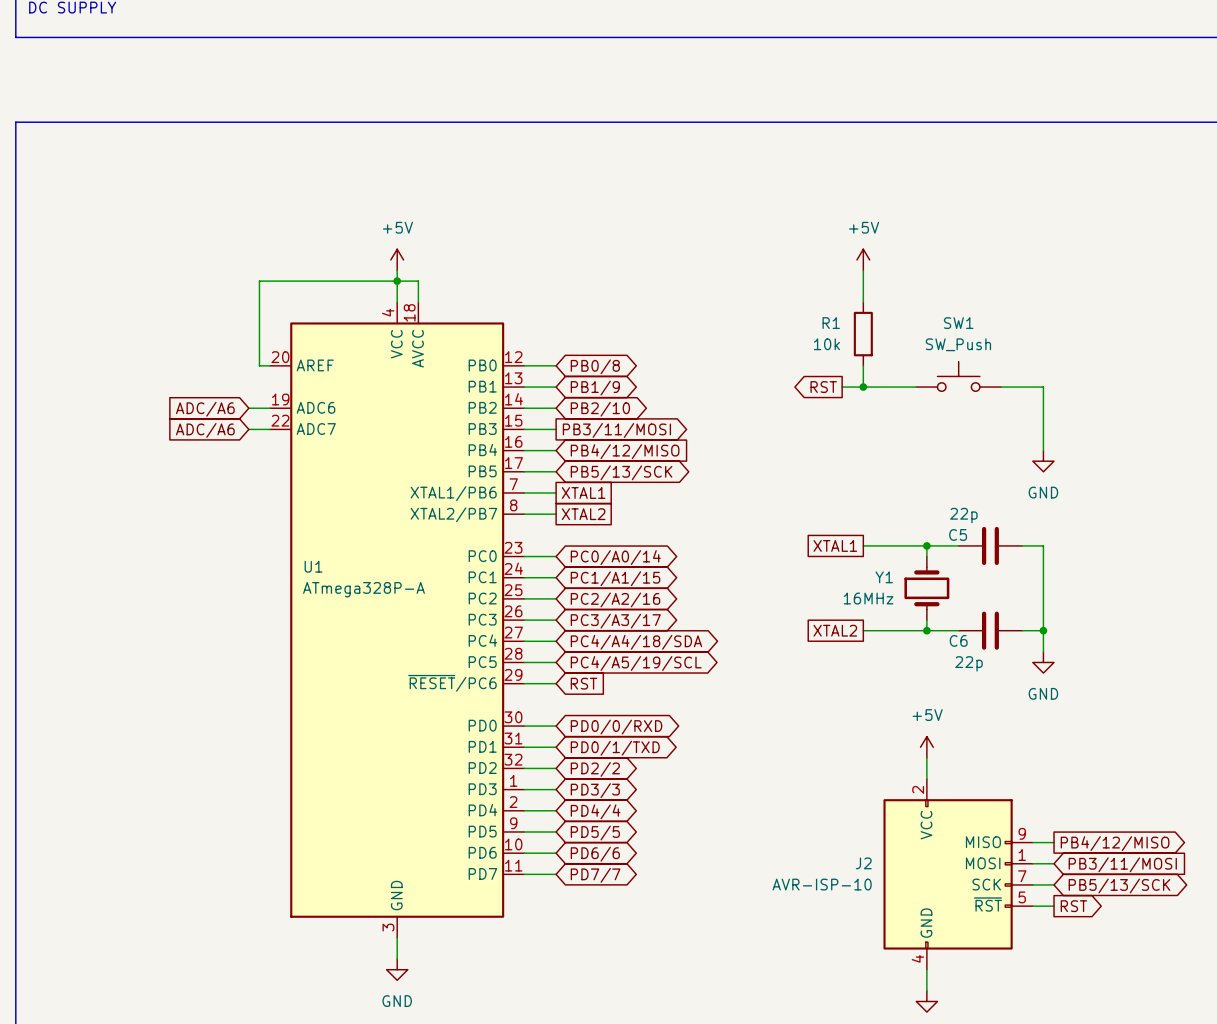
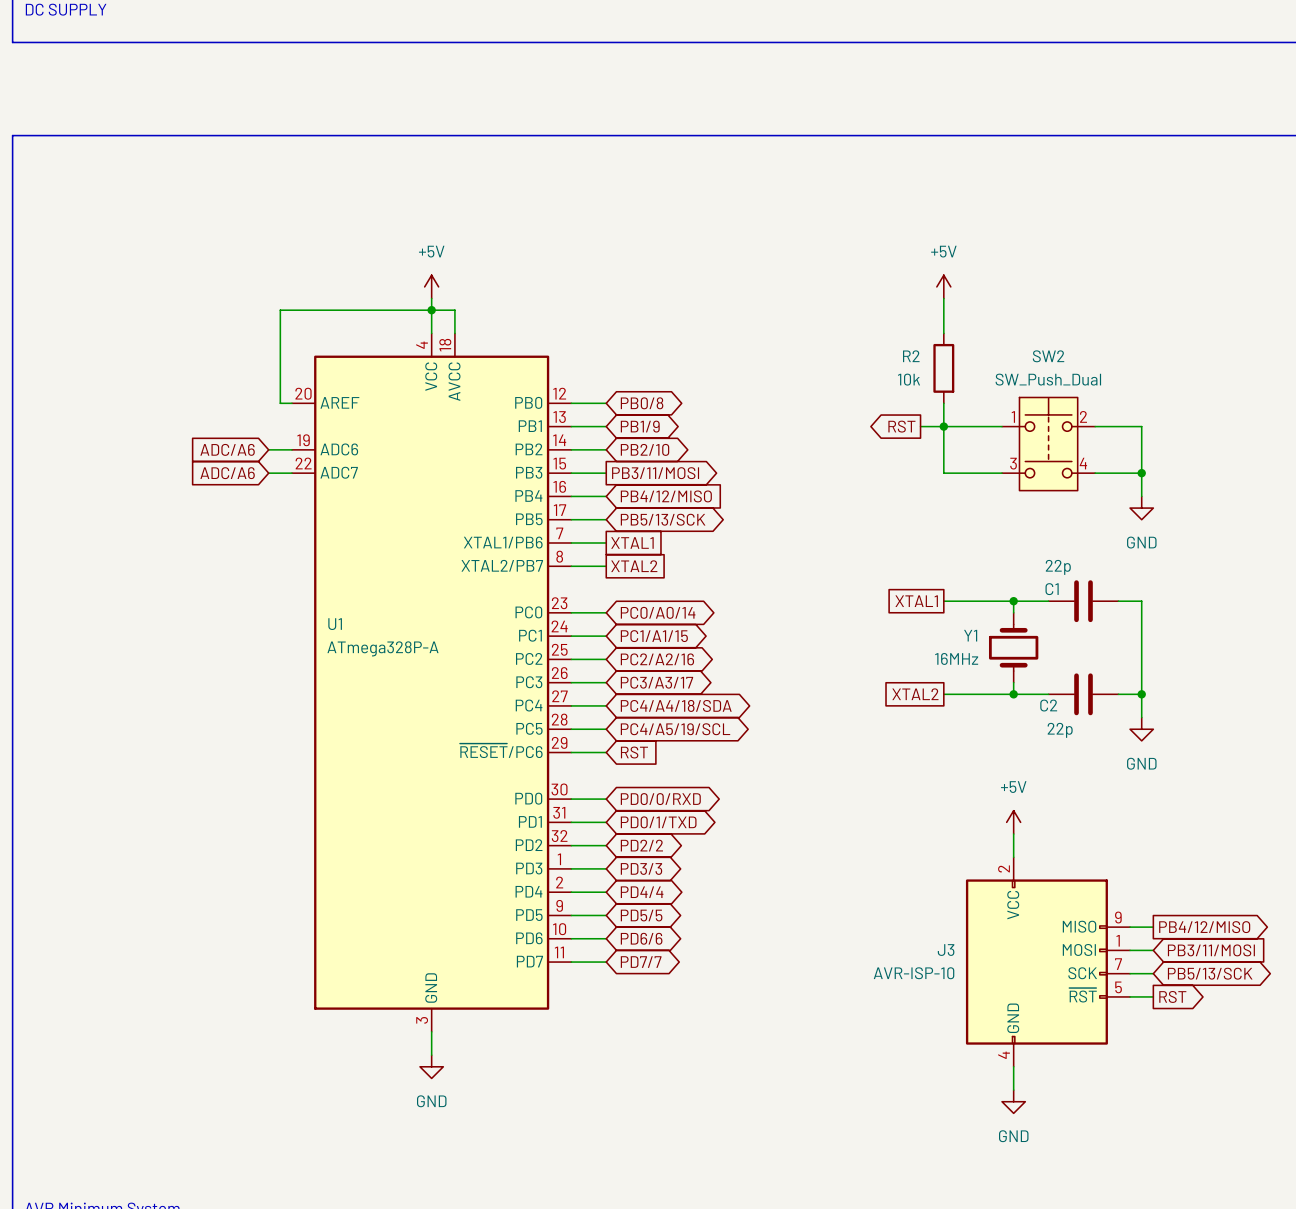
R1 name: R1 (831, 323) -> R2 (911, 356)
SW1: SW_Push (958, 376) -> none
wire: none -> (943, 426) (943, 473) (1002, 473)
SW2: none -> SW_Push_Dual (1048, 444)
wire: none -> (1095, 473) (1141, 473)
junction: none -> (1141, 473)
C5 name: C5 (958, 534) -> C1 (1052, 589)
C6 name: C6 (958, 640) -> C2 (1048, 705)
J2 name: J2 (863, 863) -> J3 (946, 950)

